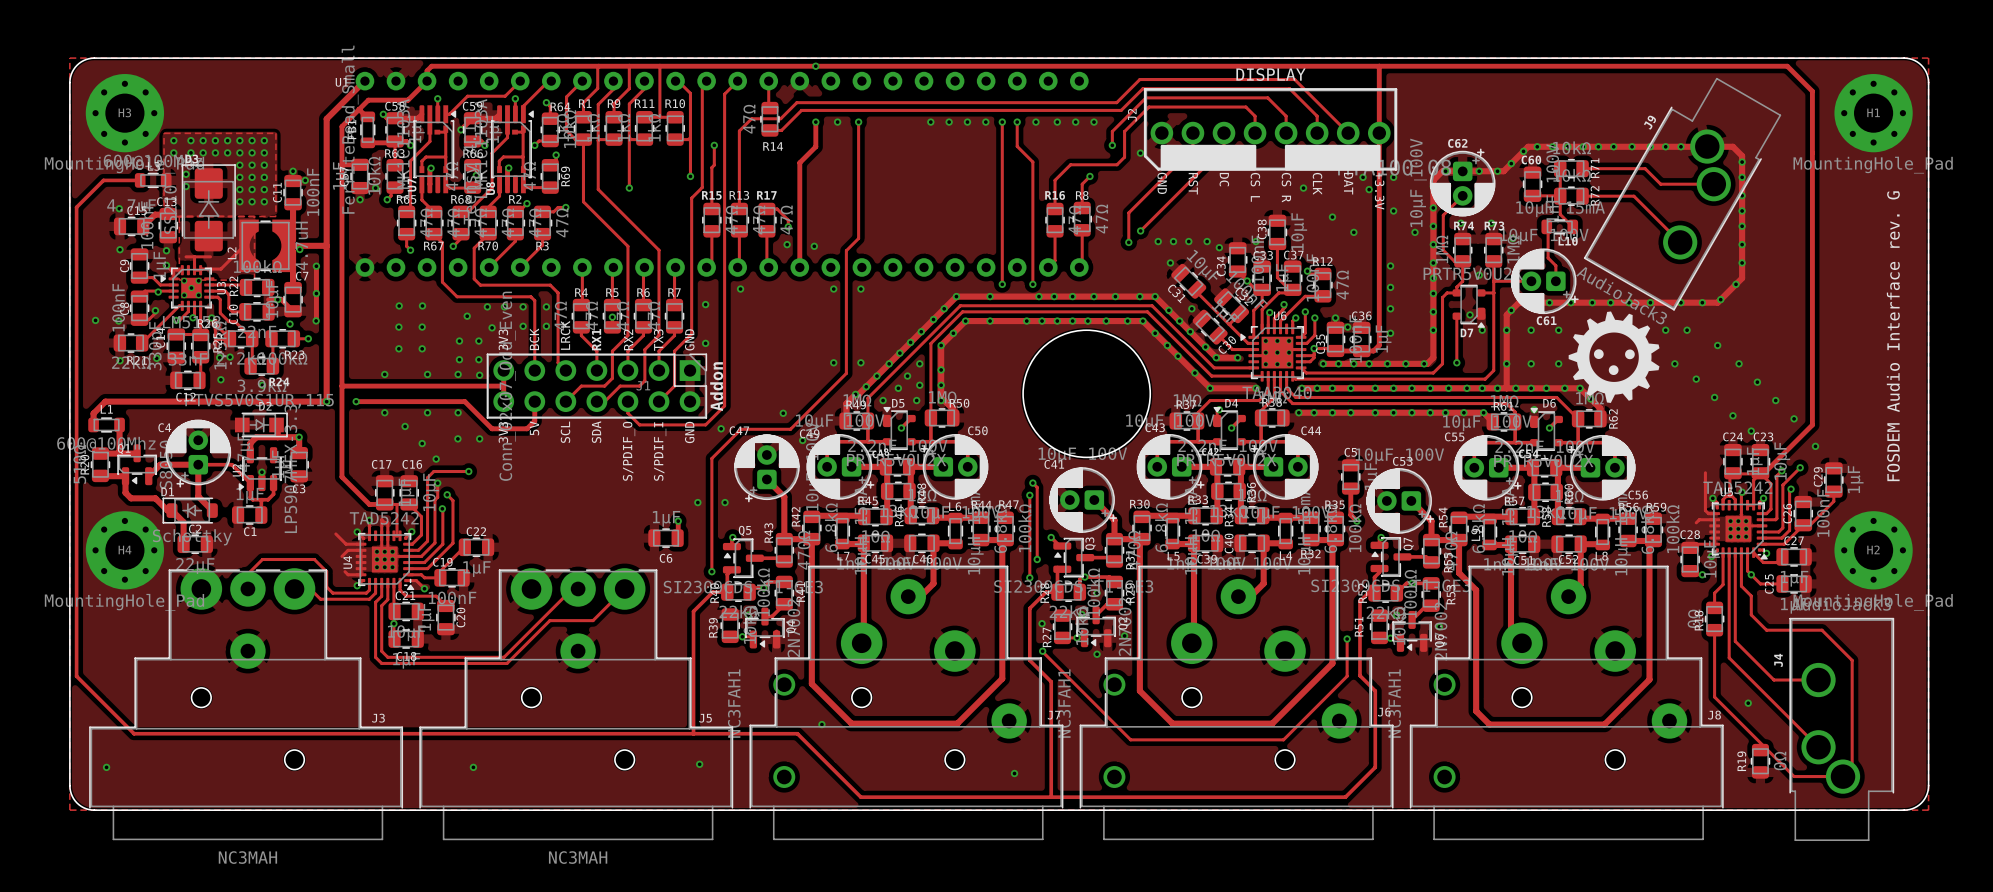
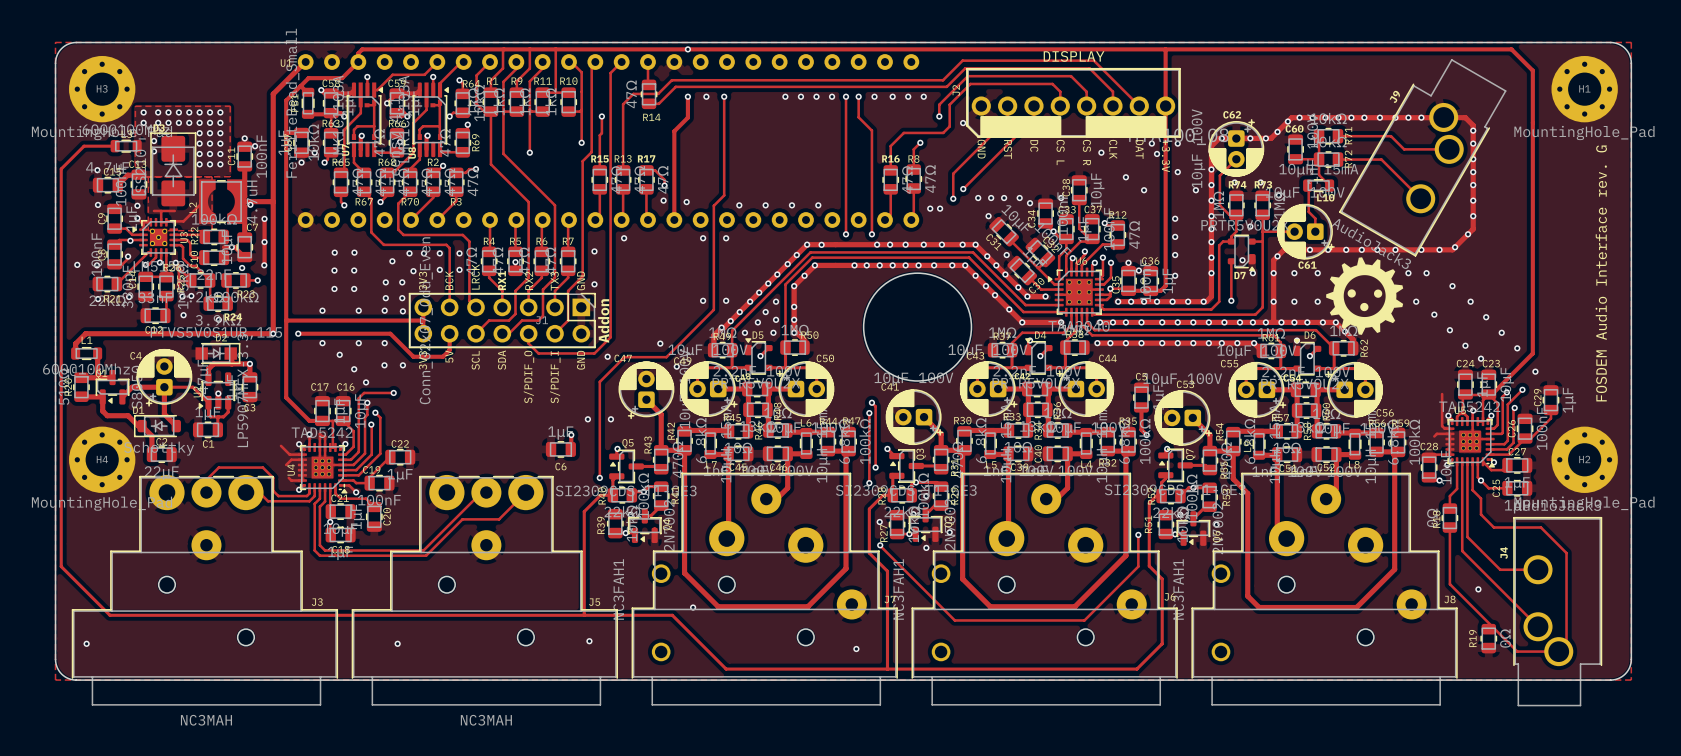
via: none -> (739, 205)
via: none -> (765, 205)
via: none -> (791, 205)
via: none -> (818, 205)
via: none -> (930, 208)
via: none -> (940, 208)
via: none -> (821, 244)
via: (990, 296) -> none
via: (990, 321) -> none
via: none -> (854, 265)

